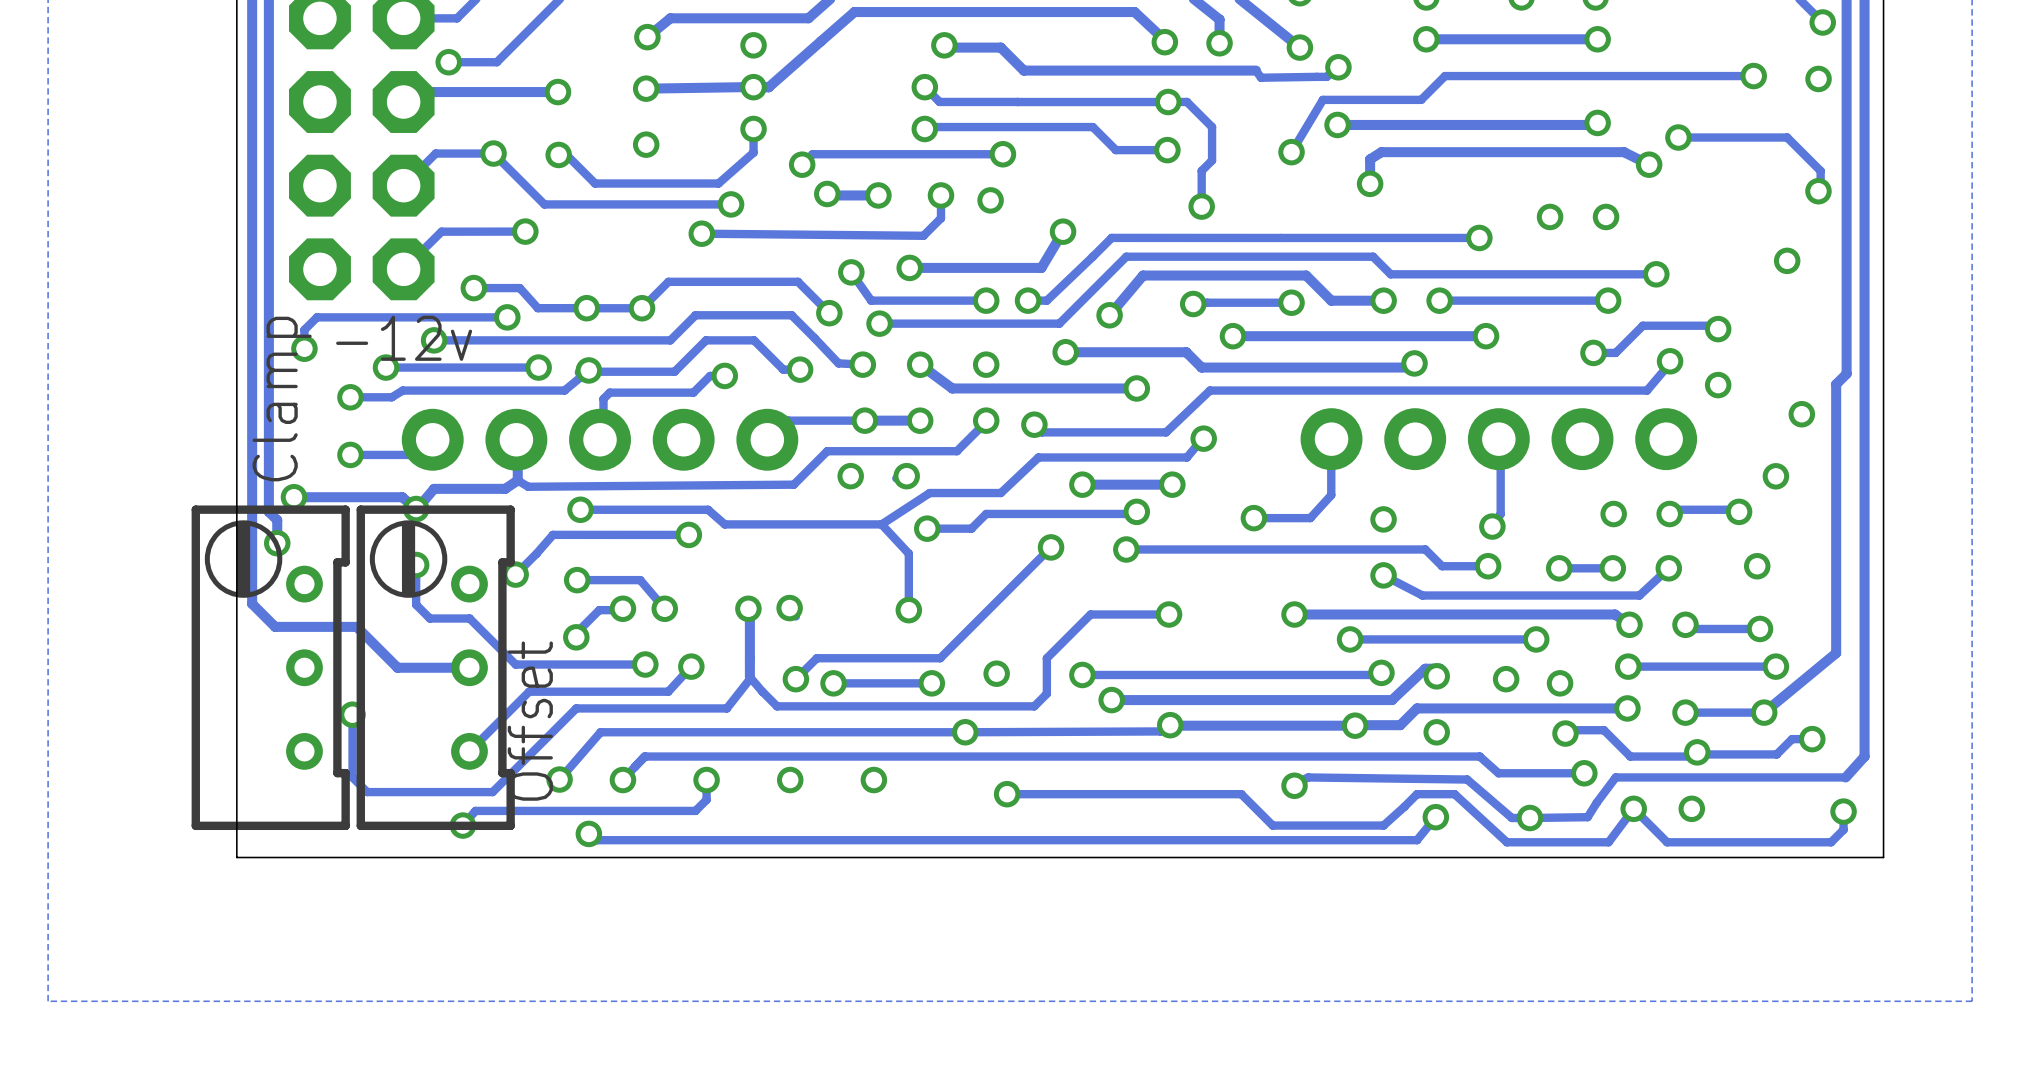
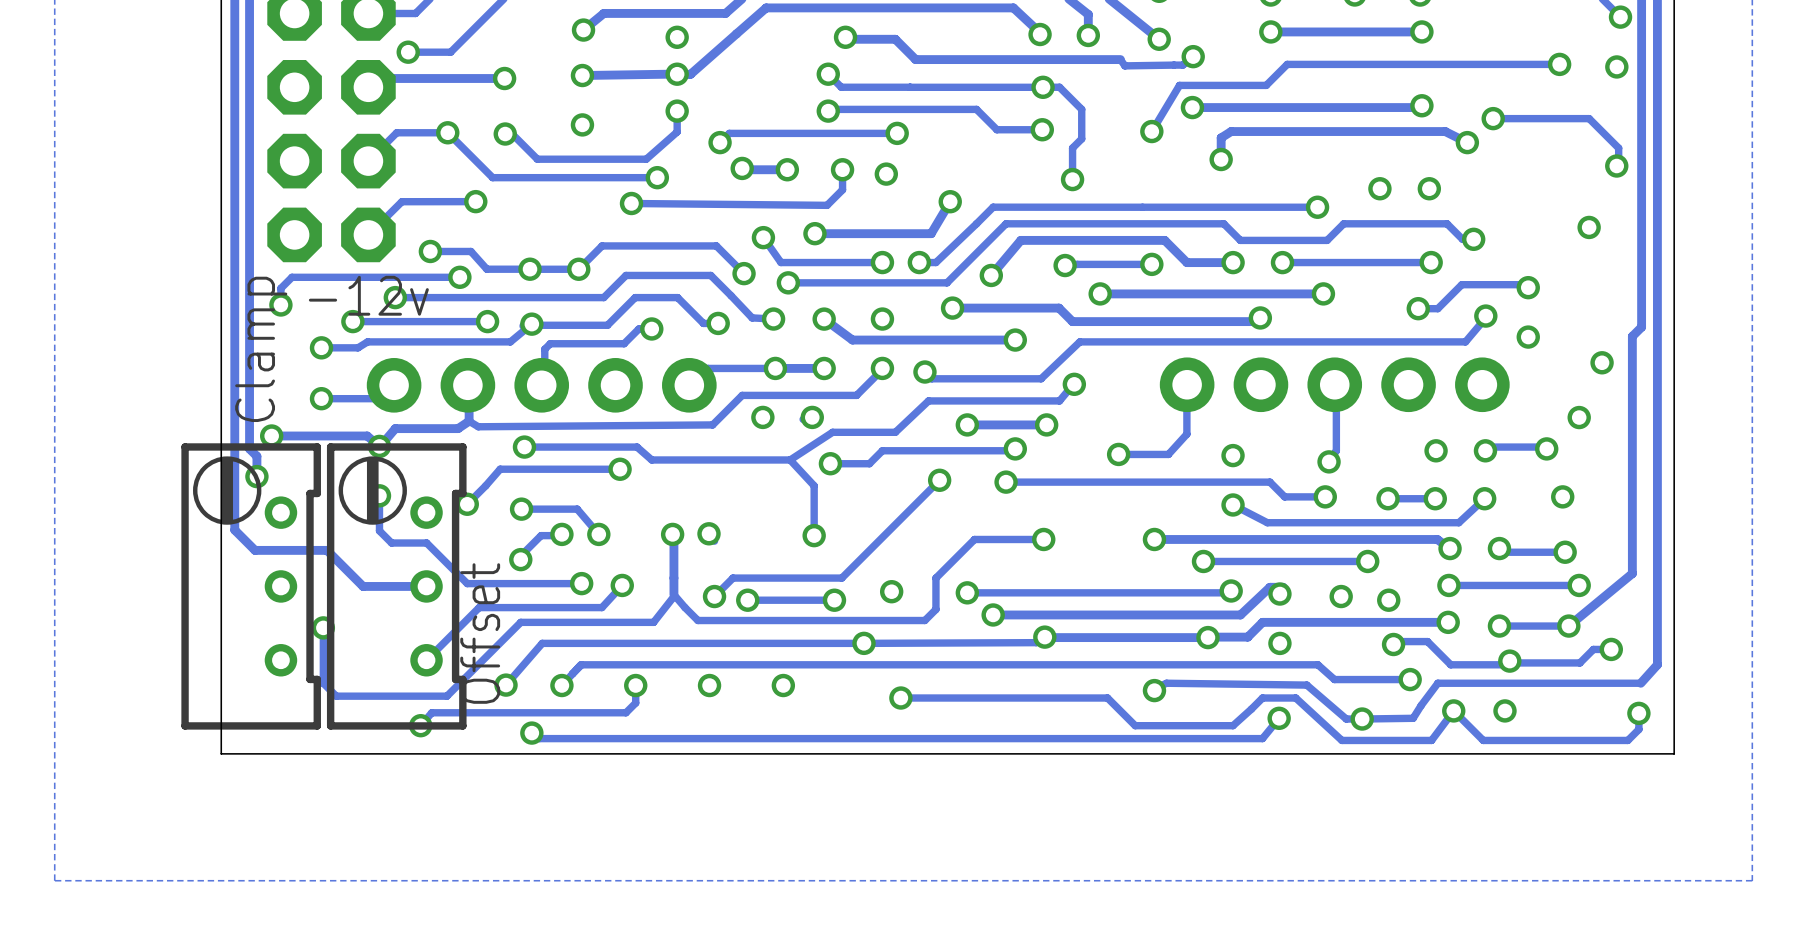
track: (1643, 274) (1390, 274) -> (1462, 239) (1447, 223) (1343, 223) (1327, 240) (1239, 239)

